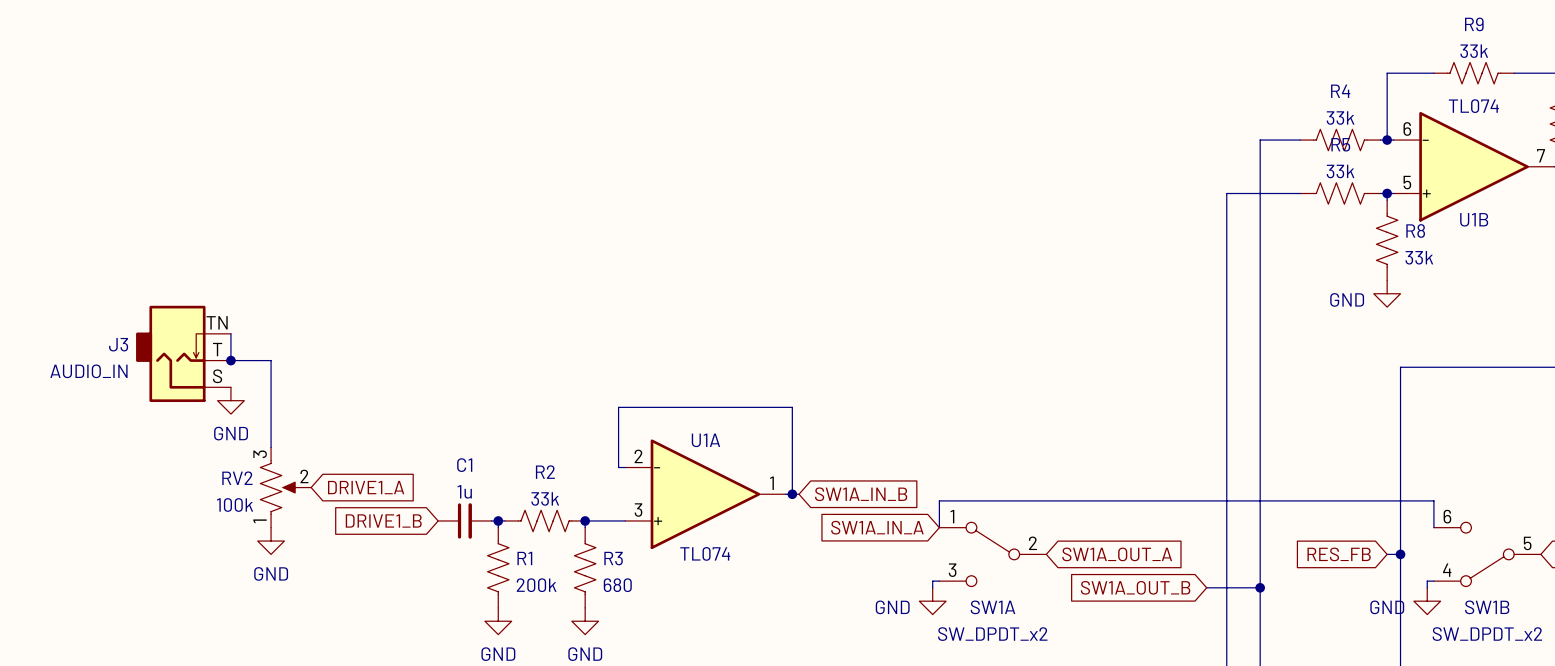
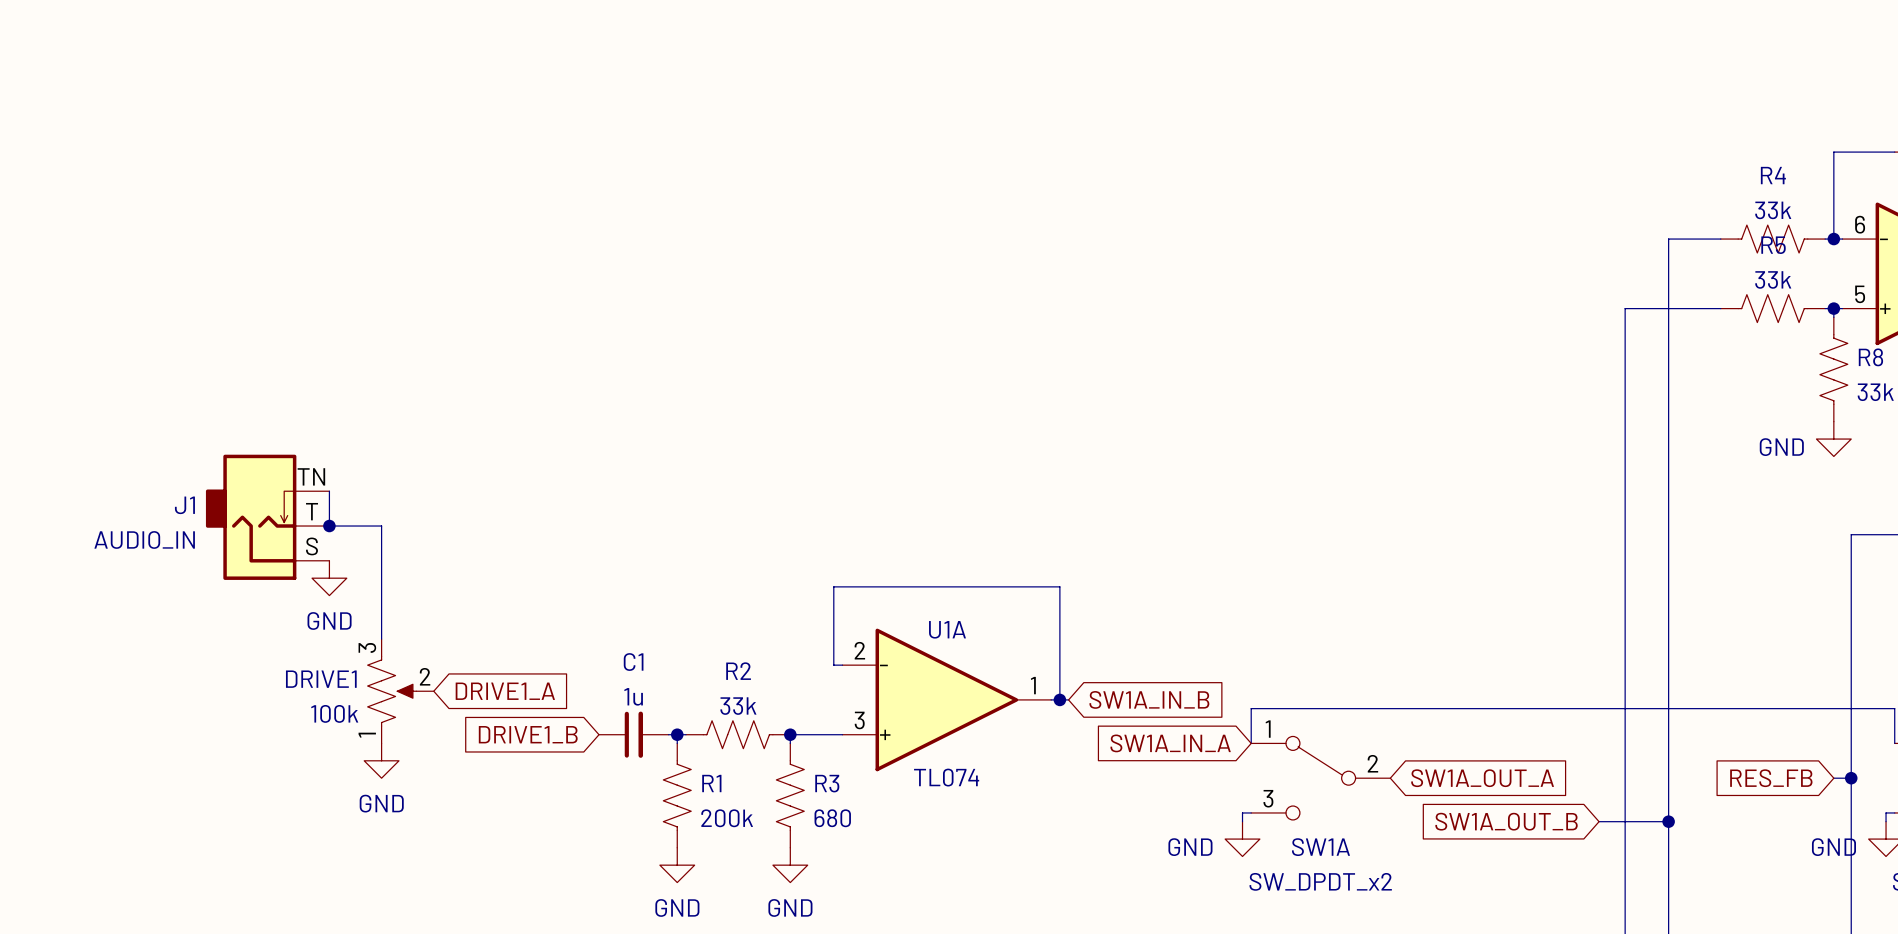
J3 name: J3 (118, 344) -> J1 (184, 505)
RV2 name: RV2 (237, 478) -> DRIVE1 (321, 679)

